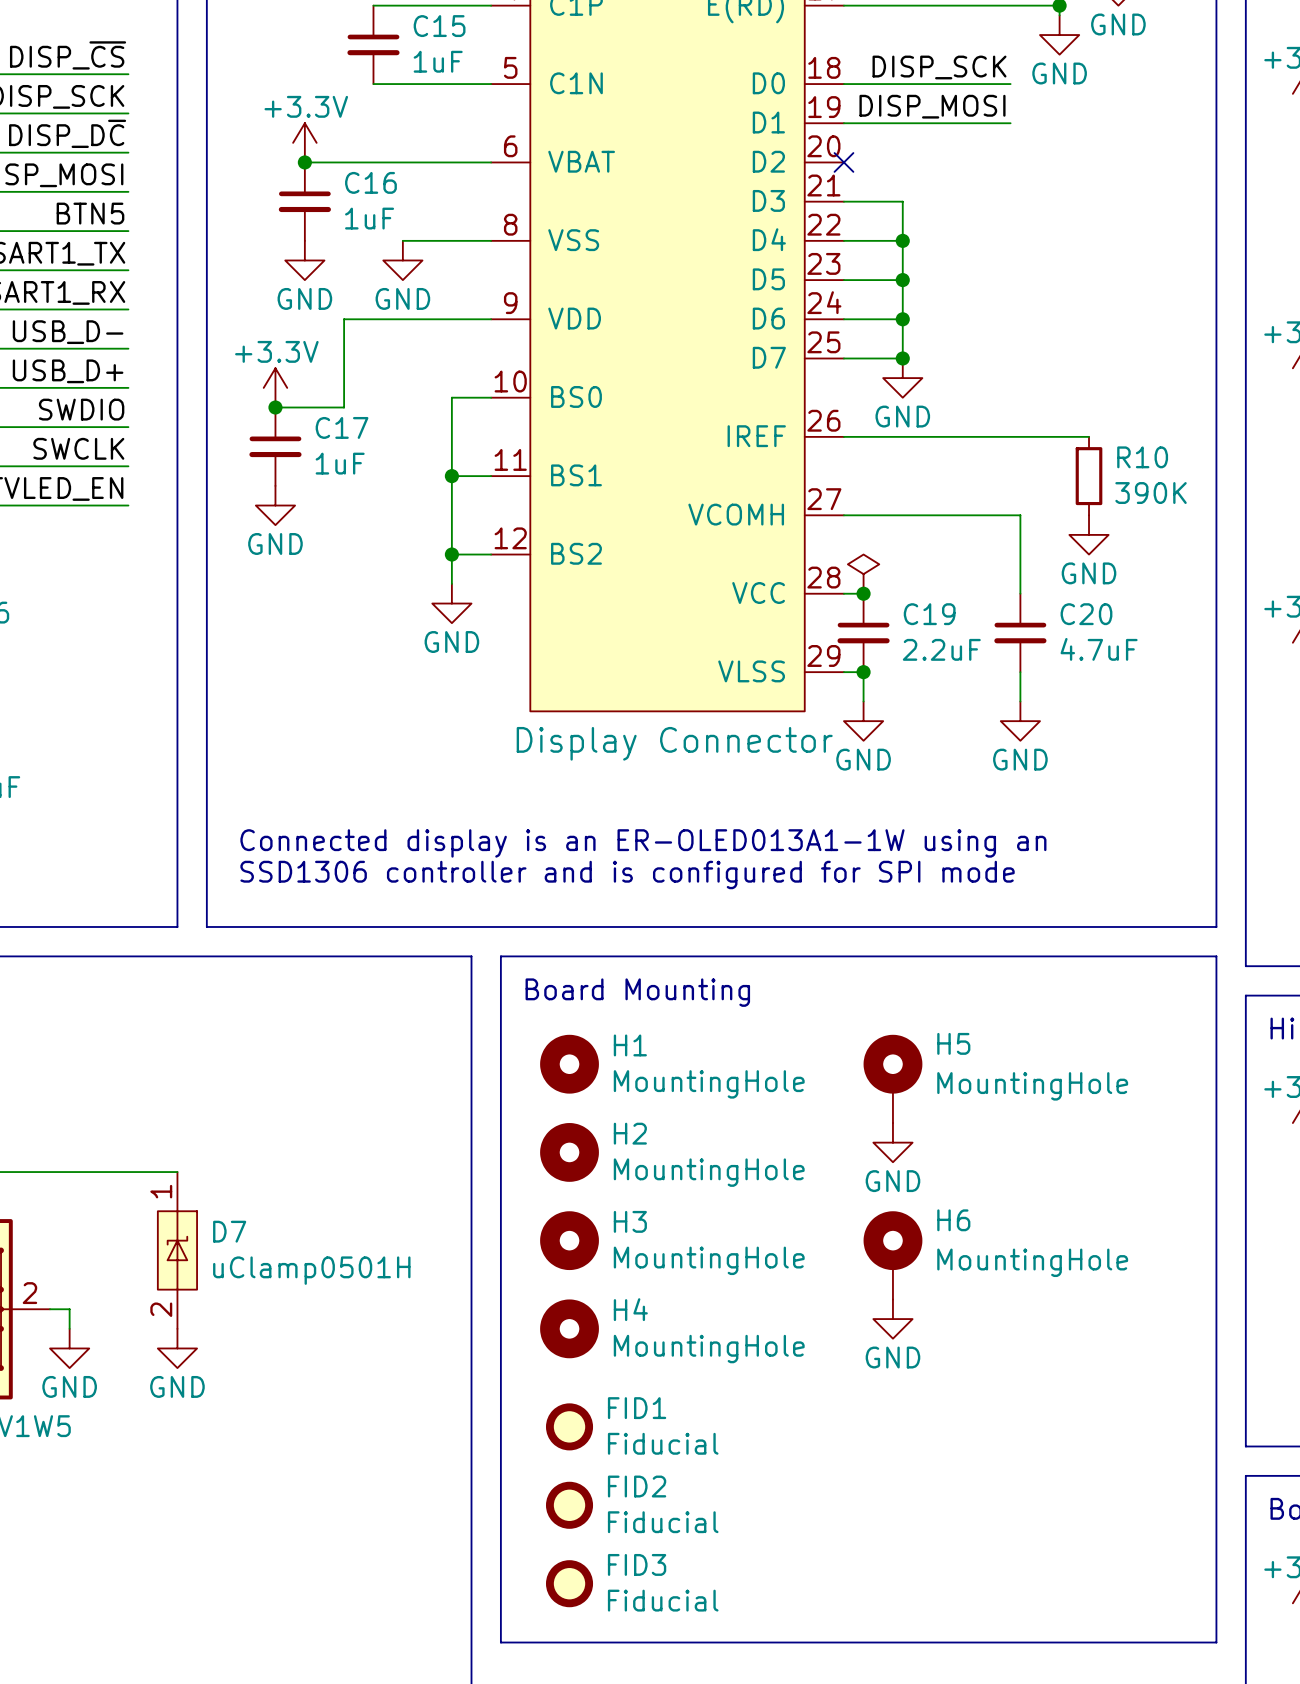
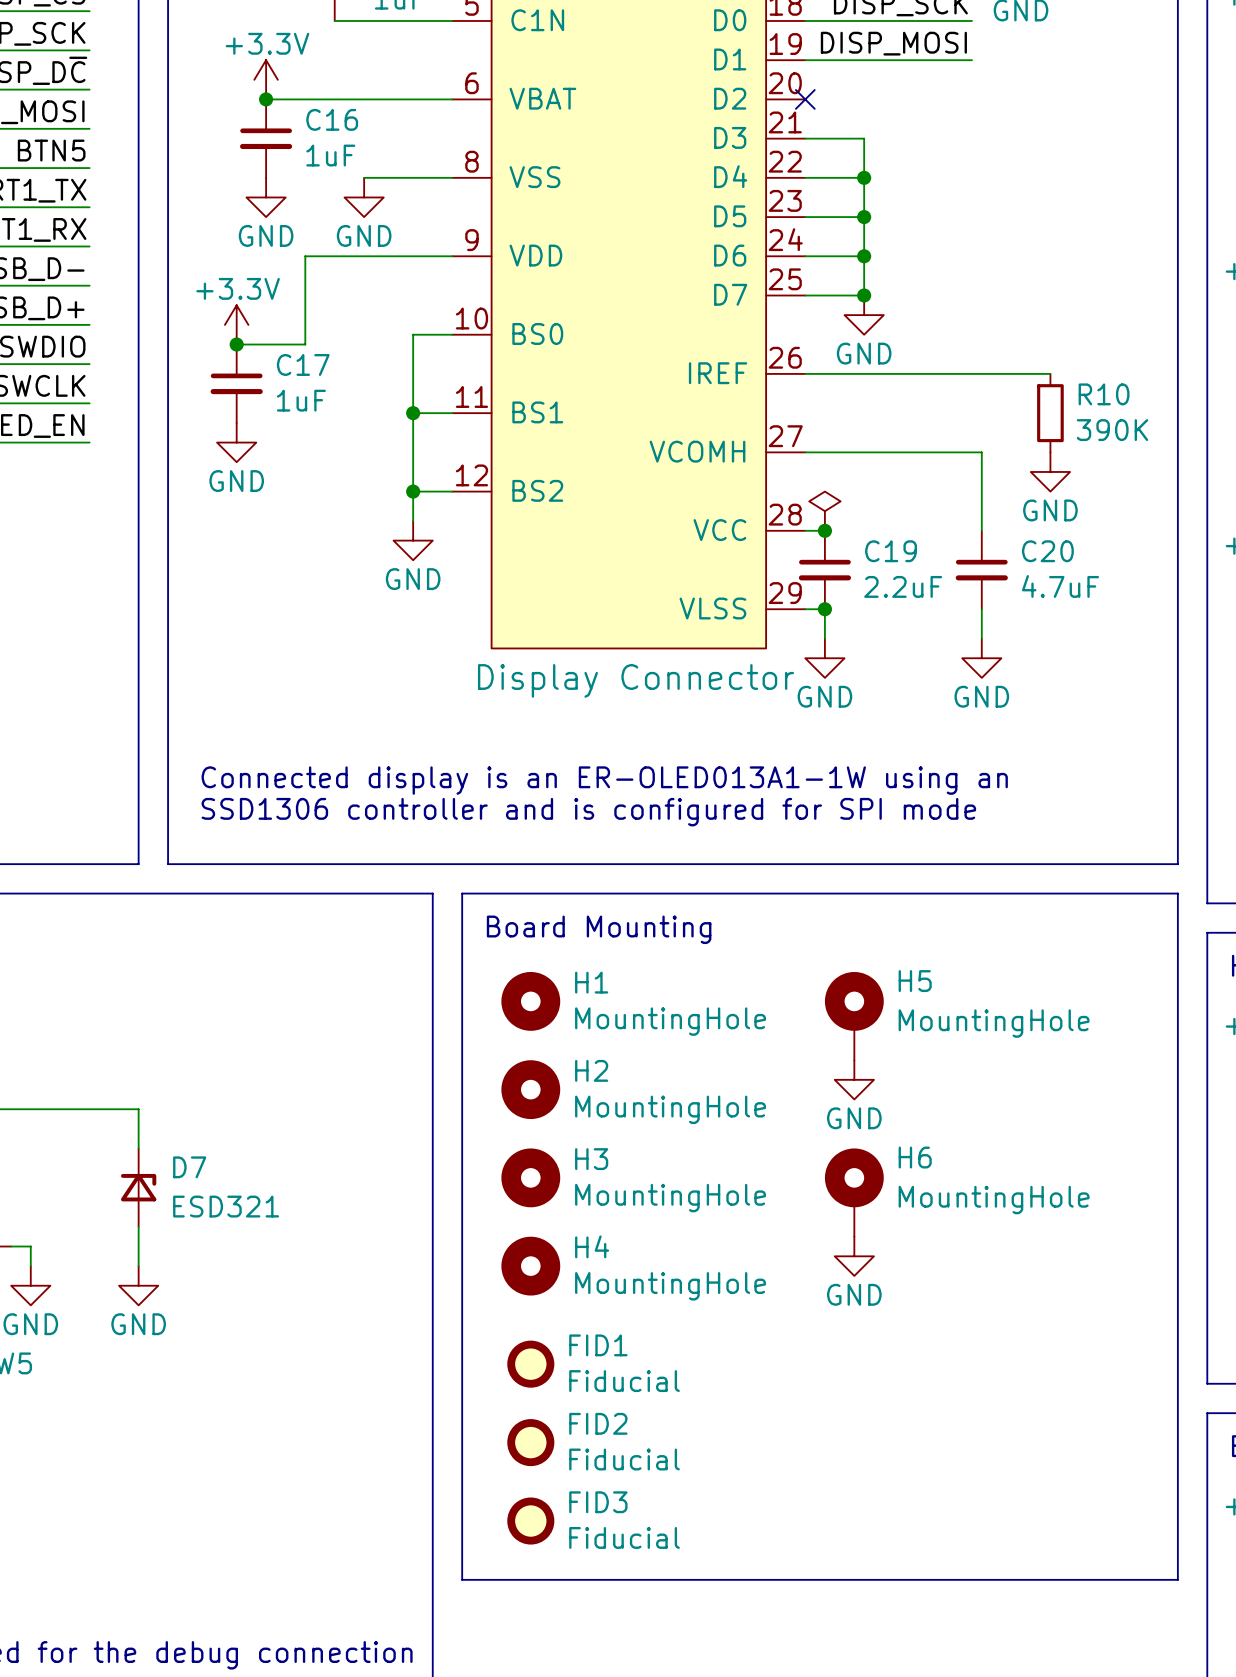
D7 symbol: [157, 1172, 198, 1329] -> [120, 1148, 157, 1227]
D7 value: uClamp0501H (311, 1270) -> ESD321 (226, 1206)

